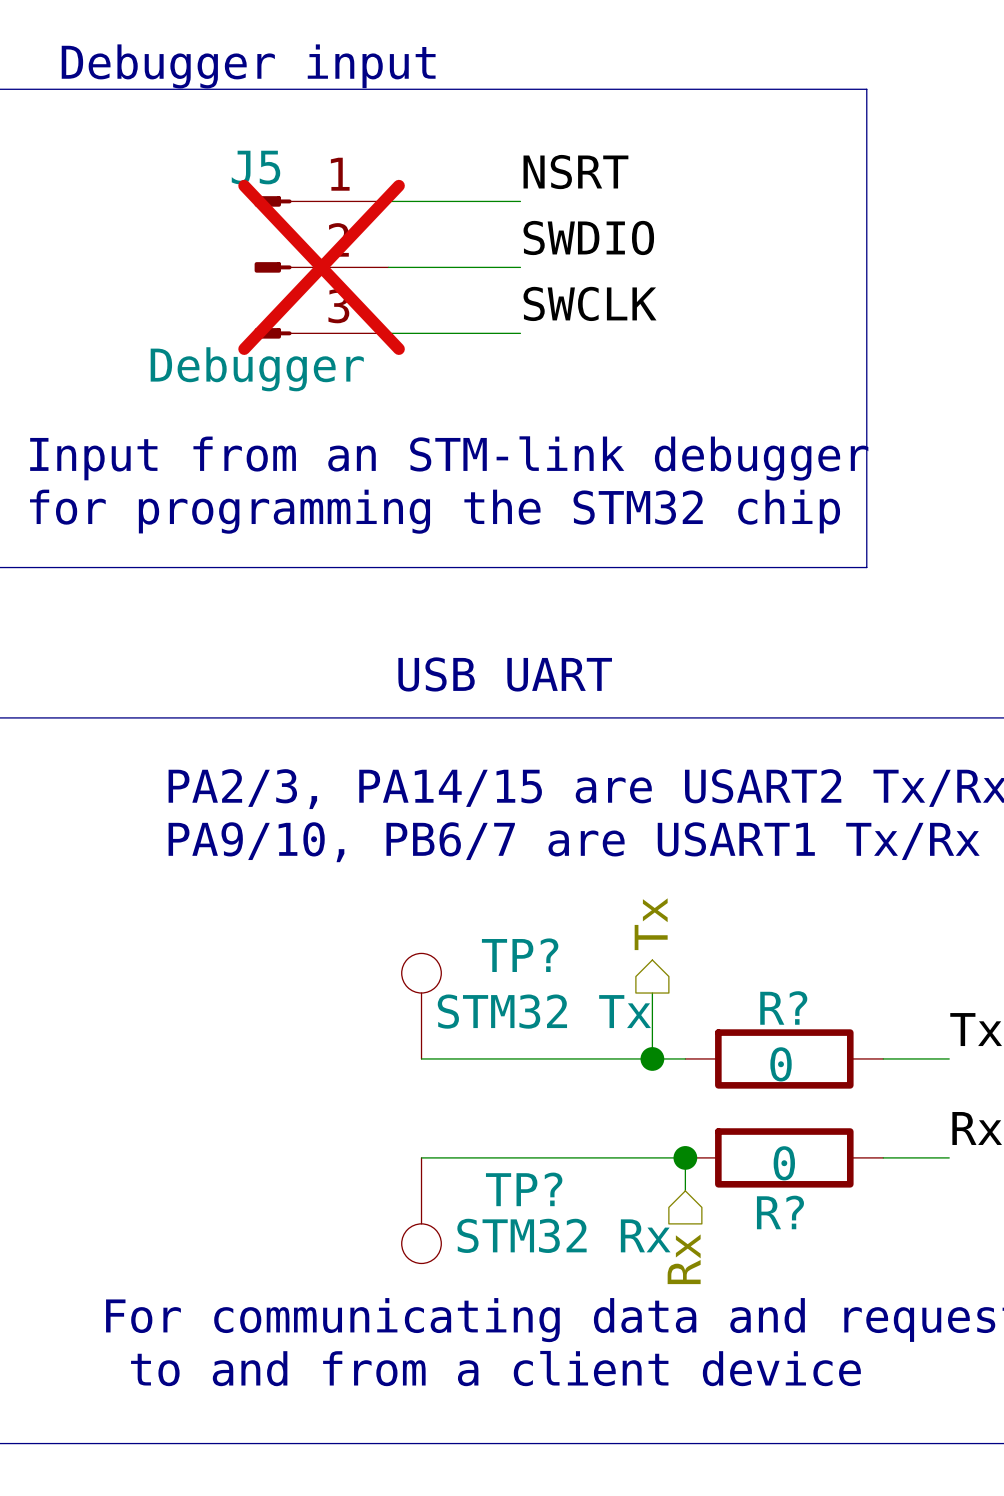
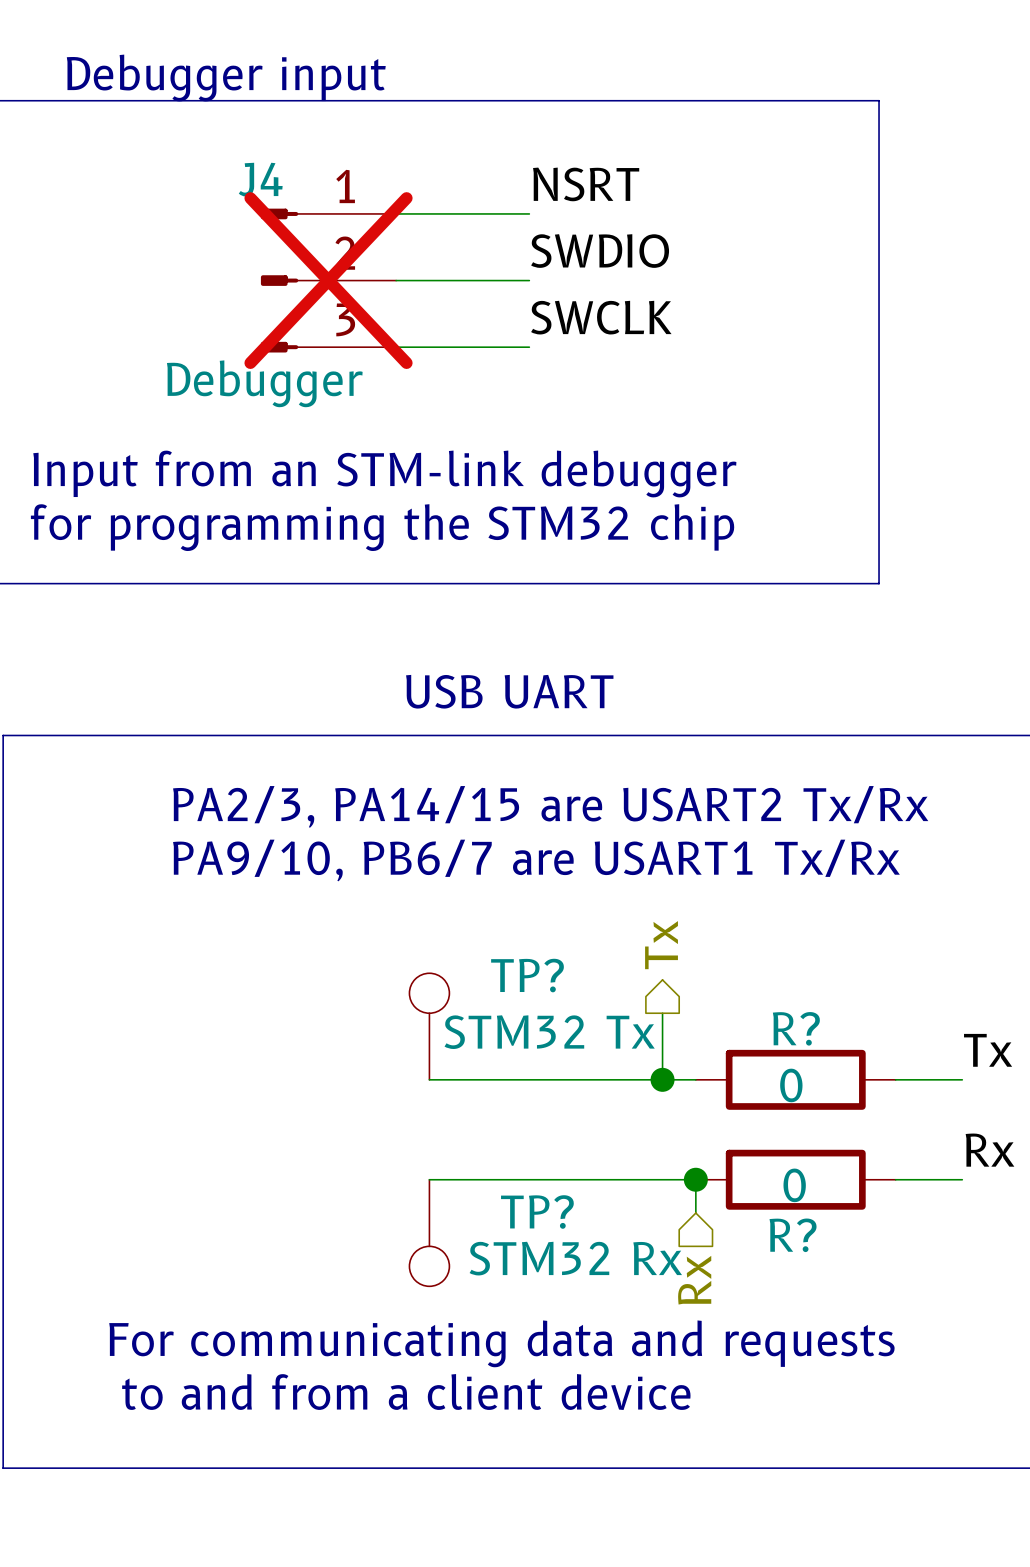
J5 name: J5 (255, 167) -> J4 (260, 179)

